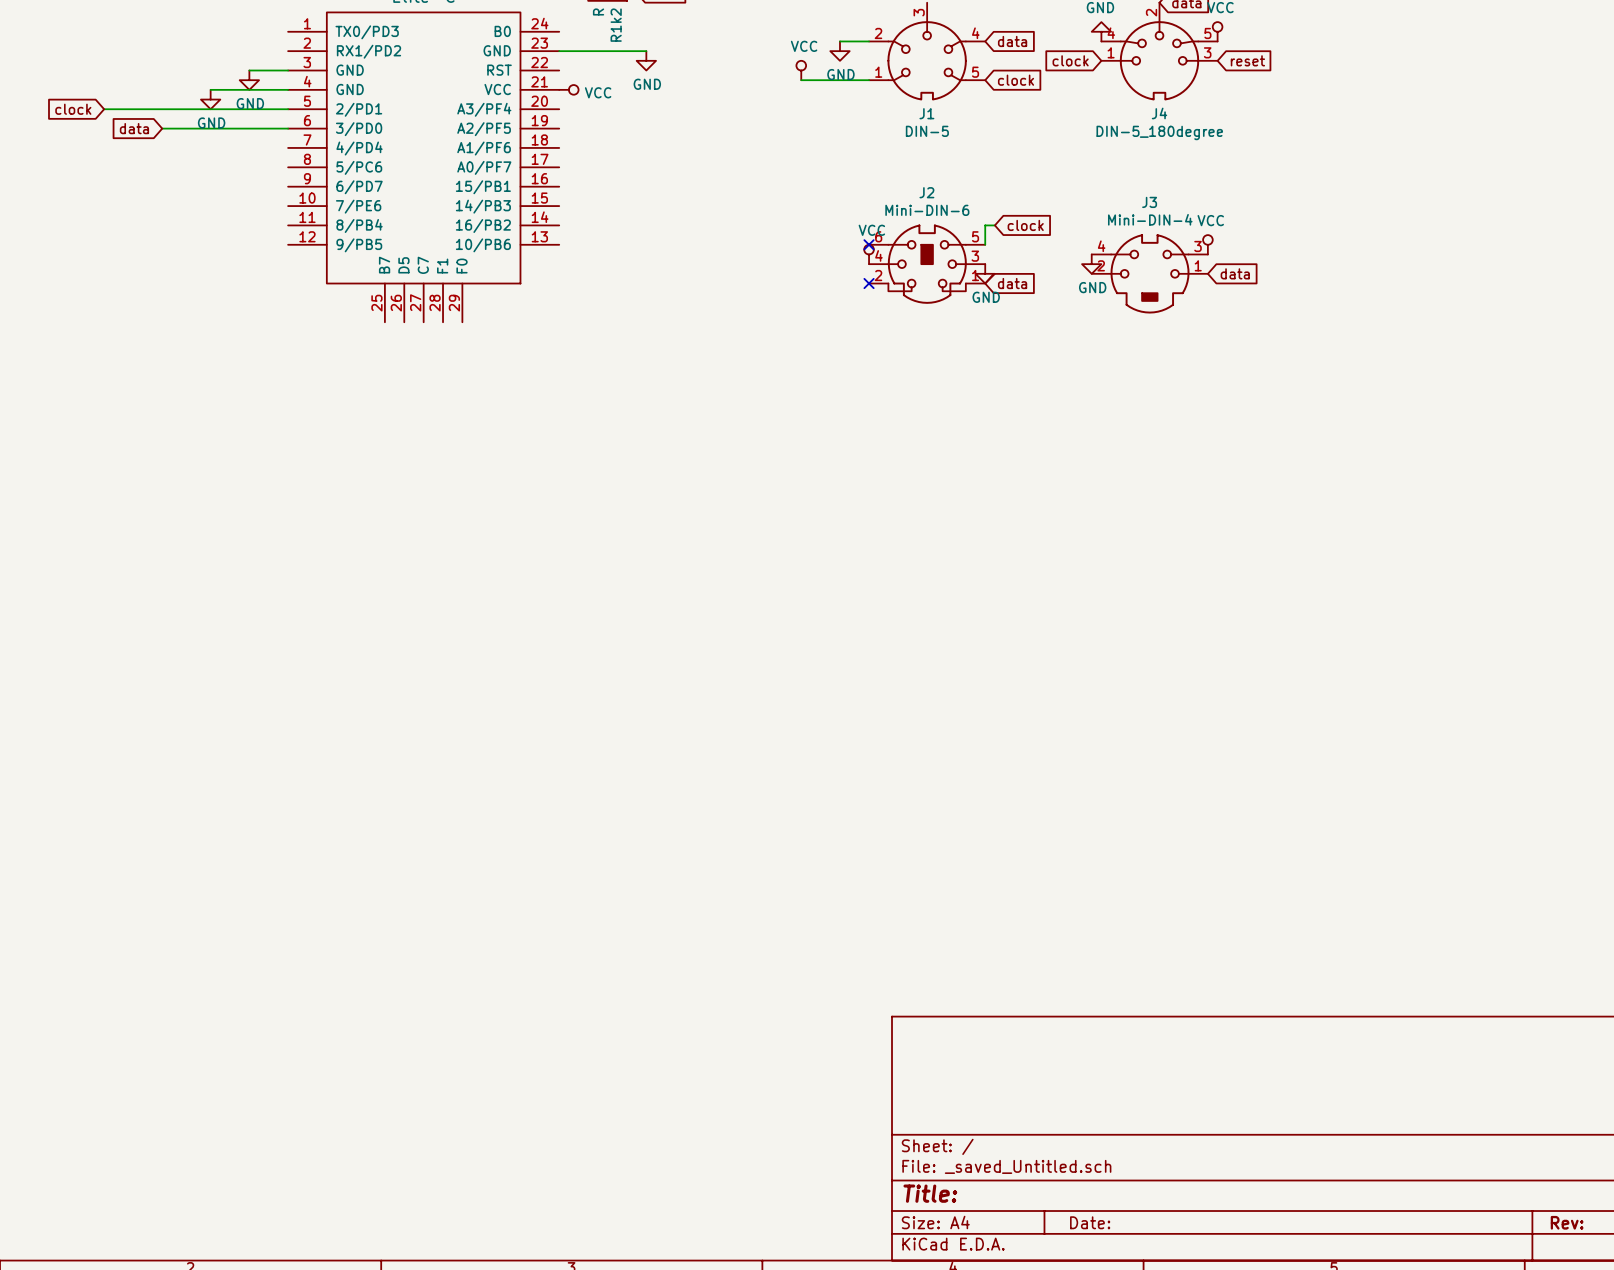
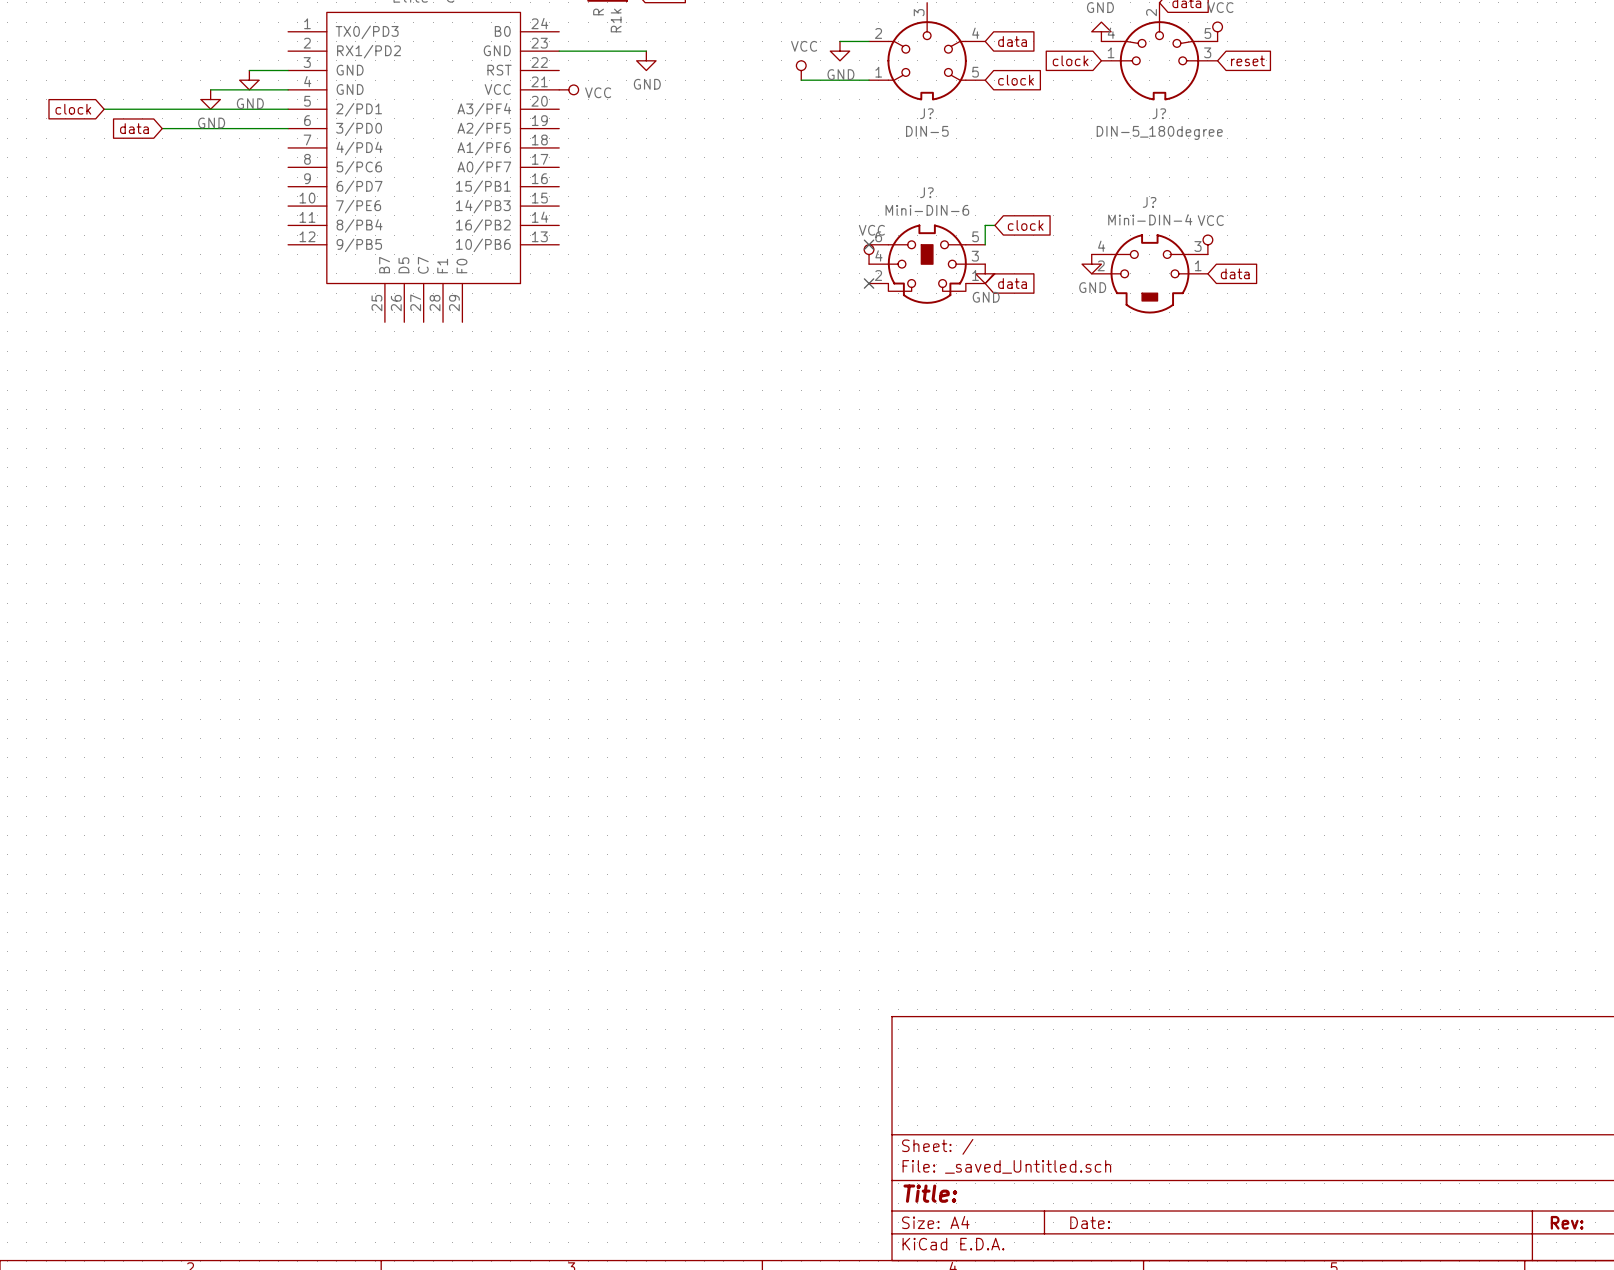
R1k2 name: R1k2 (616, 25) -> R1k (616, 20)
J1 name: J1 (926, 113) -> J? (926, 113)
J4 name: J4 (1159, 113) -> J? (1159, 113)
J2 name: J2 (926, 192) -> J? (926, 192)
J3 name: J3 (1149, 202) -> J? (1149, 202)

